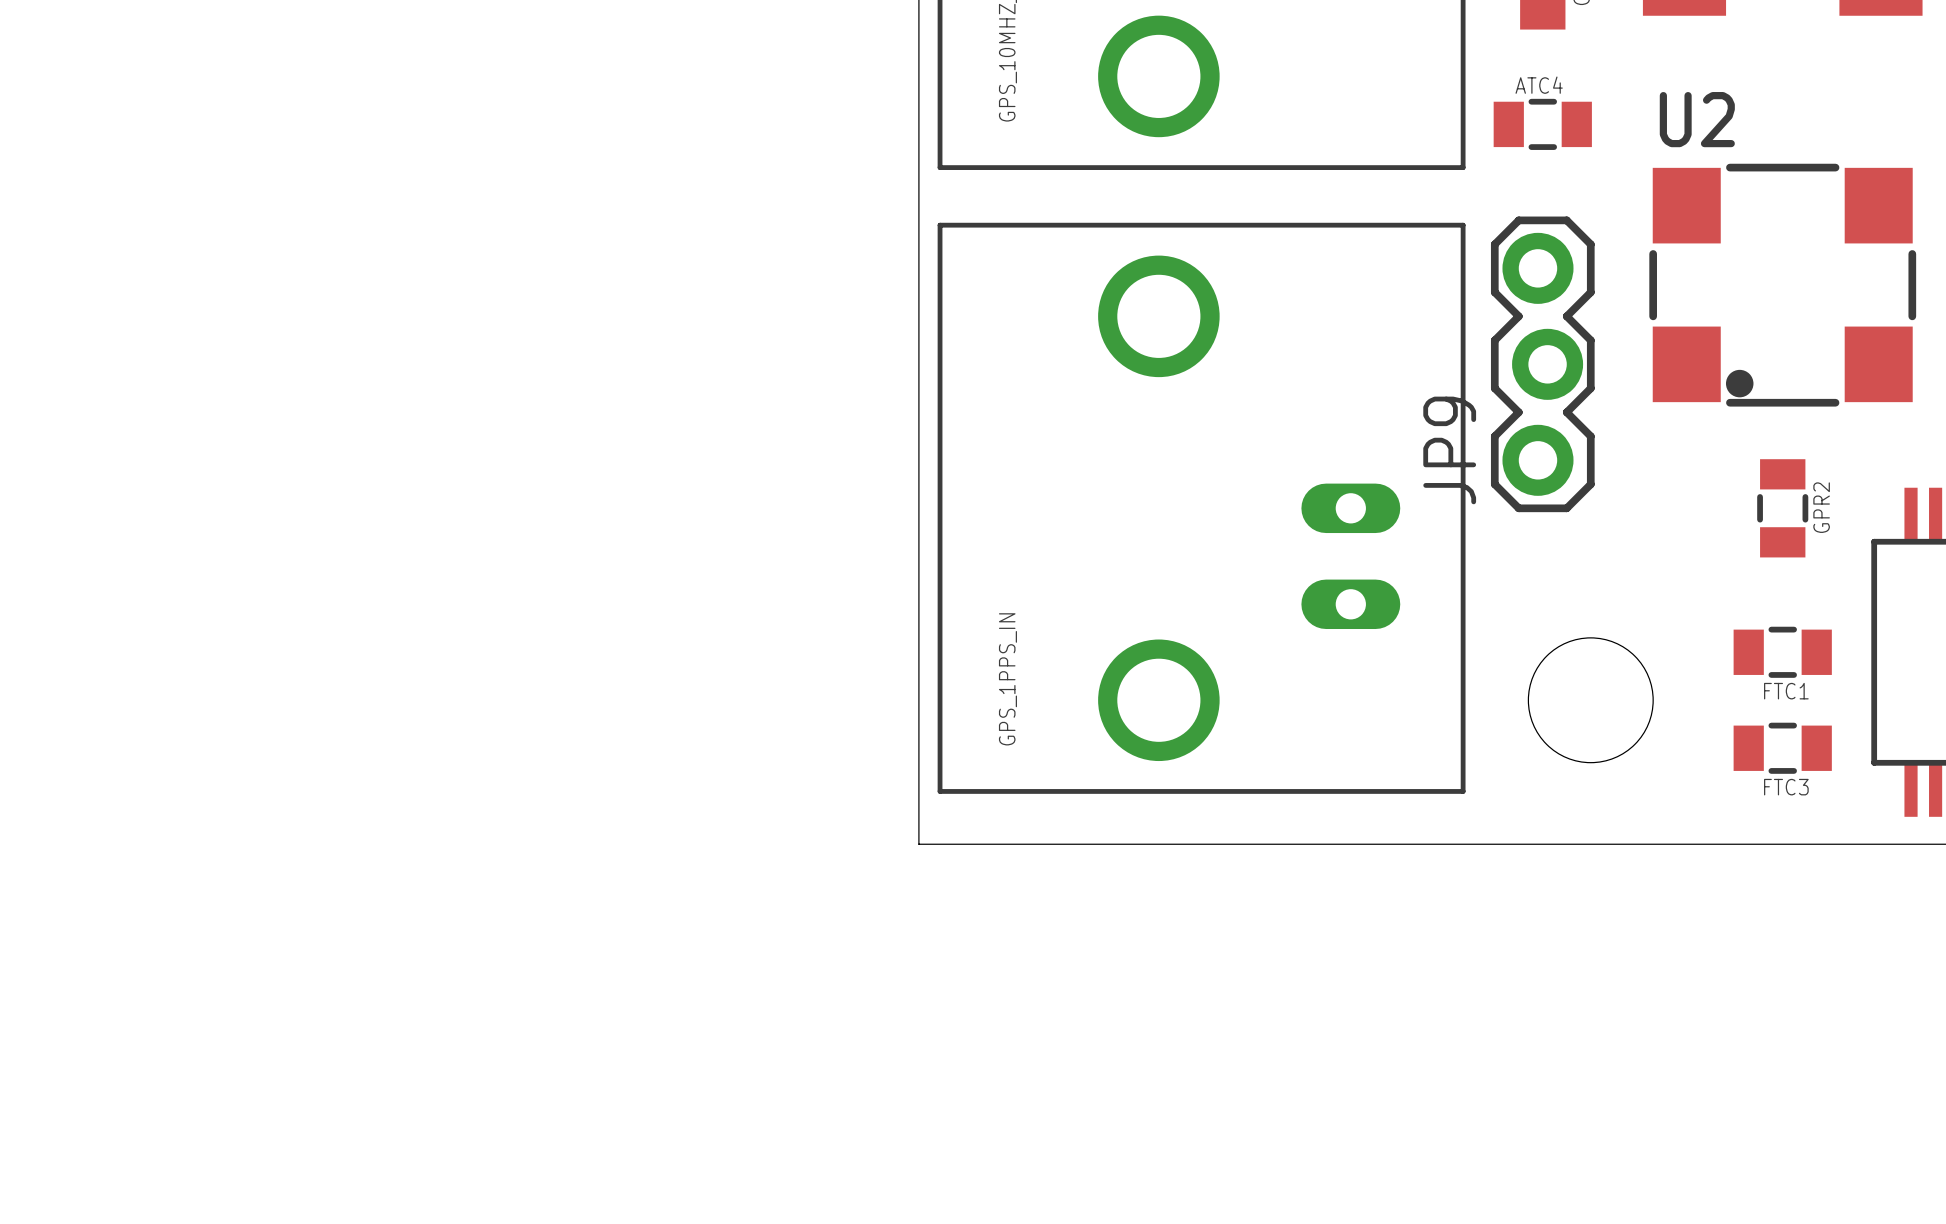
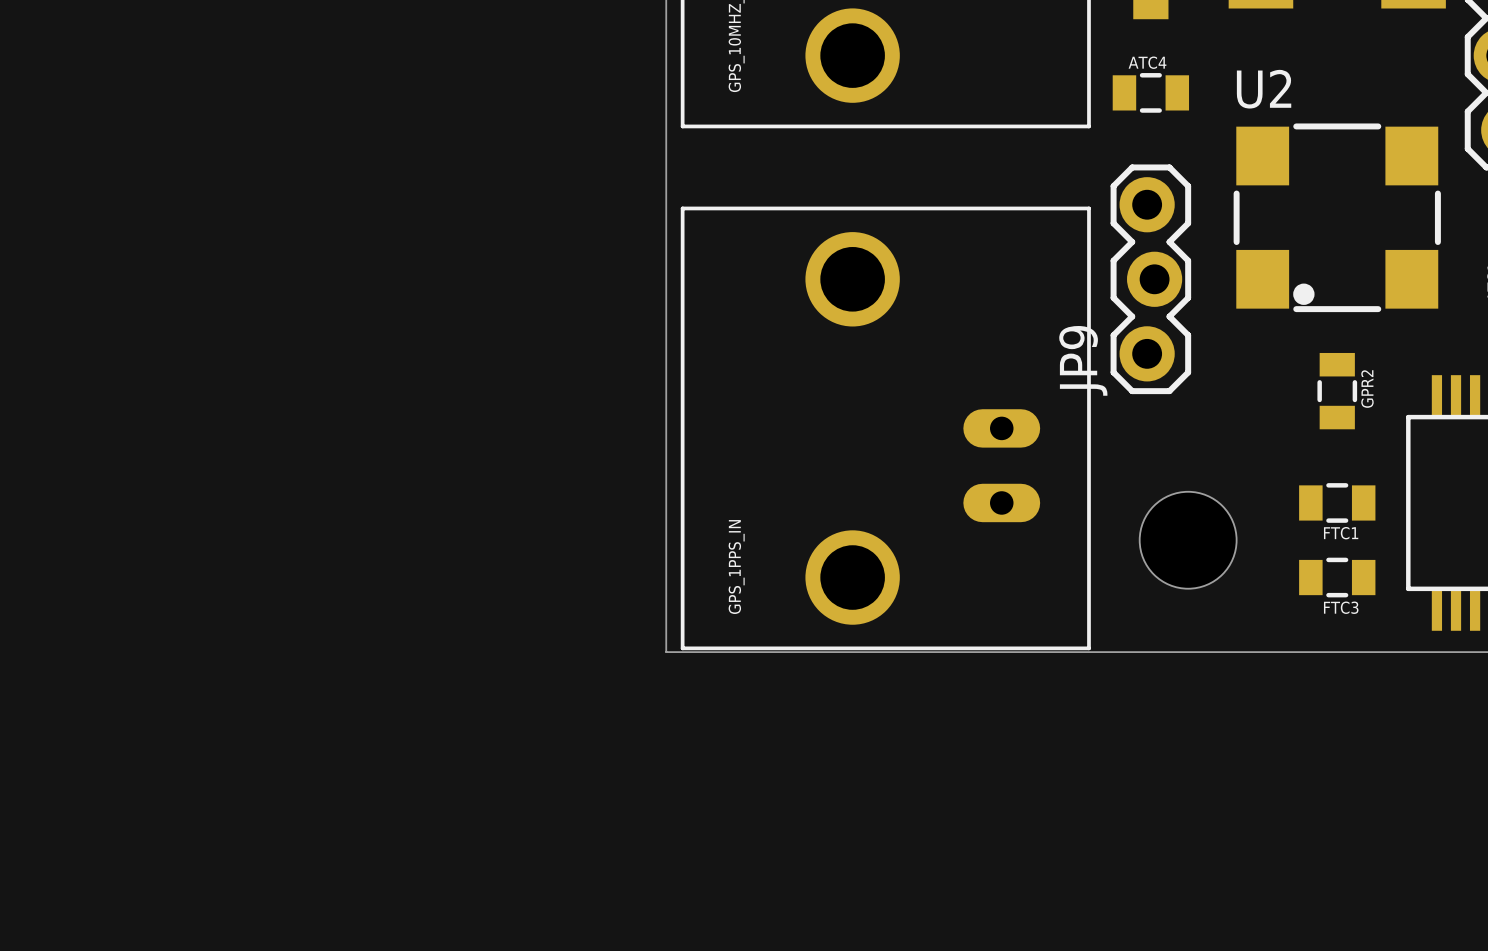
GPS_1PPS_IN position: (1201, 508) -> (885, 428)

